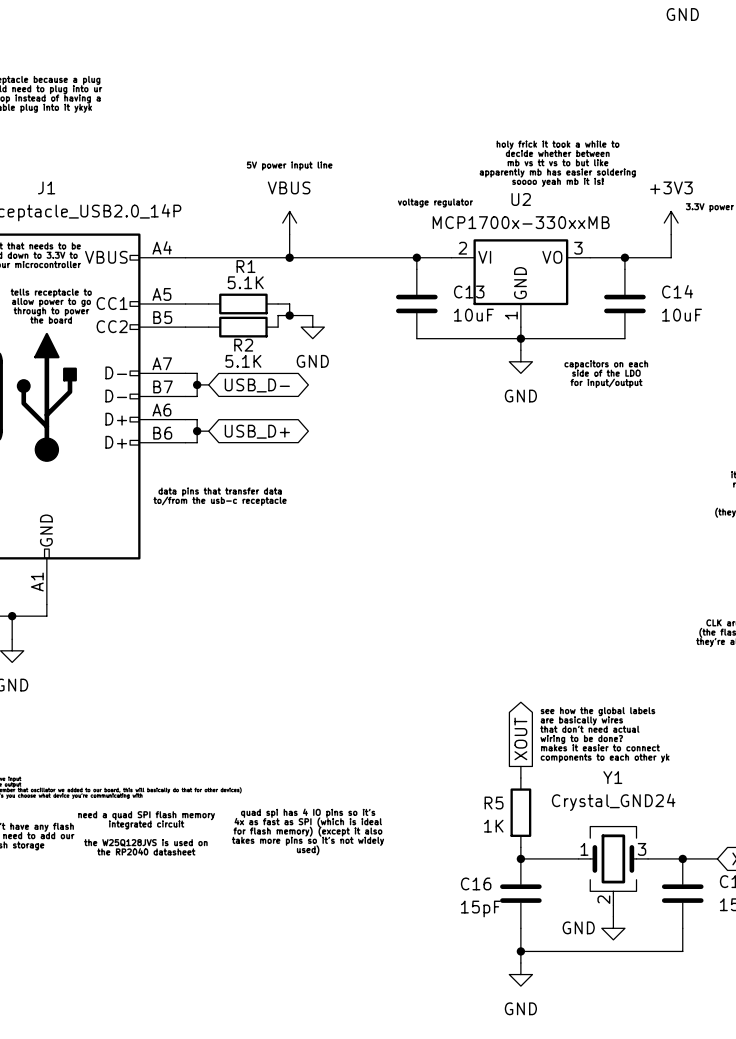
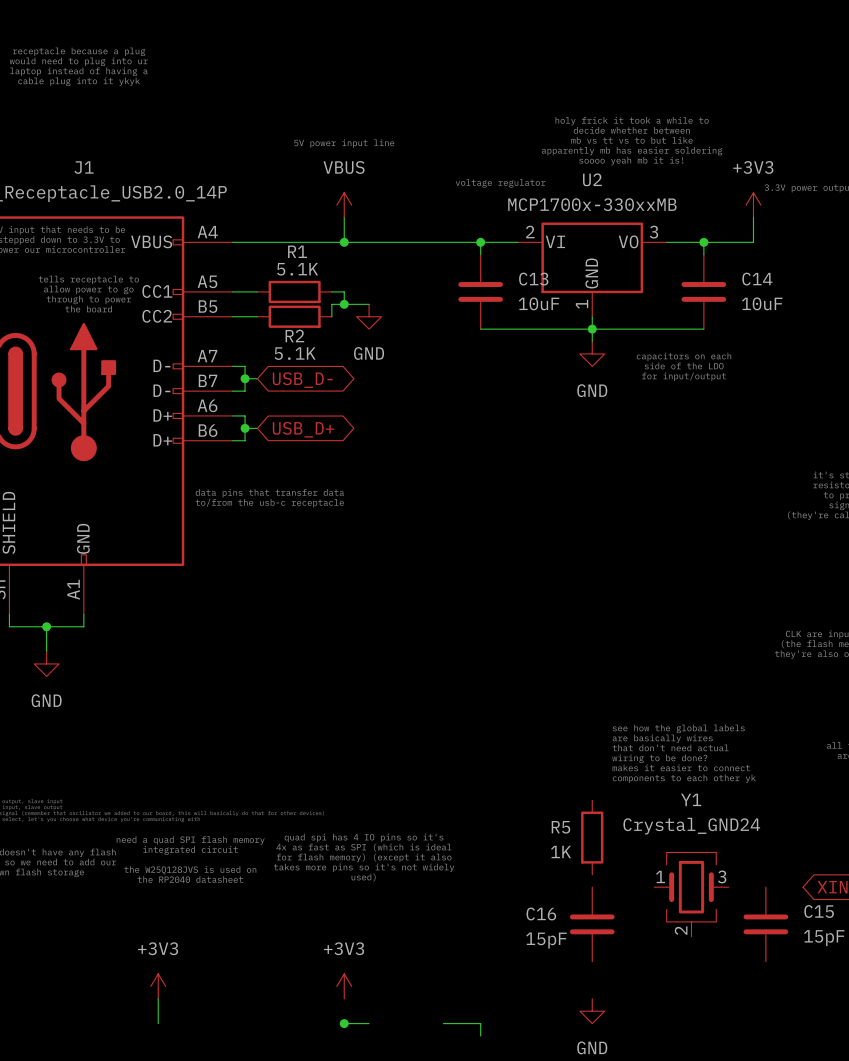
global label: XOUT (520, 738) -> none
wire: (520, 766) (520, 778) -> none
wire: (520, 847) (520, 858) (578, 858) -> none
junction: (520, 858) -> none
wire: (648, 858) (717, 858) -> none
junction: (682, 858) -> none
wire: (613, 905) (613, 916) -> none
wire: (520, 928) (520, 963) -> none
power symbol: GND (613, 928) -> none
wire: (682, 928) (682, 951) (520, 951) -> none
power symbol: none -> +3V3 (158, 986)
power symbol: none -> +3V3 (344, 986)
junction: (520, 951) -> none
wire: none -> (158, 998) (158, 1023)
wire: none -> (344, 1023) (369, 1023)
junction: none -> (344, 1023)
wire: none -> (443, 1023) (480, 1023) (480, 1035)

